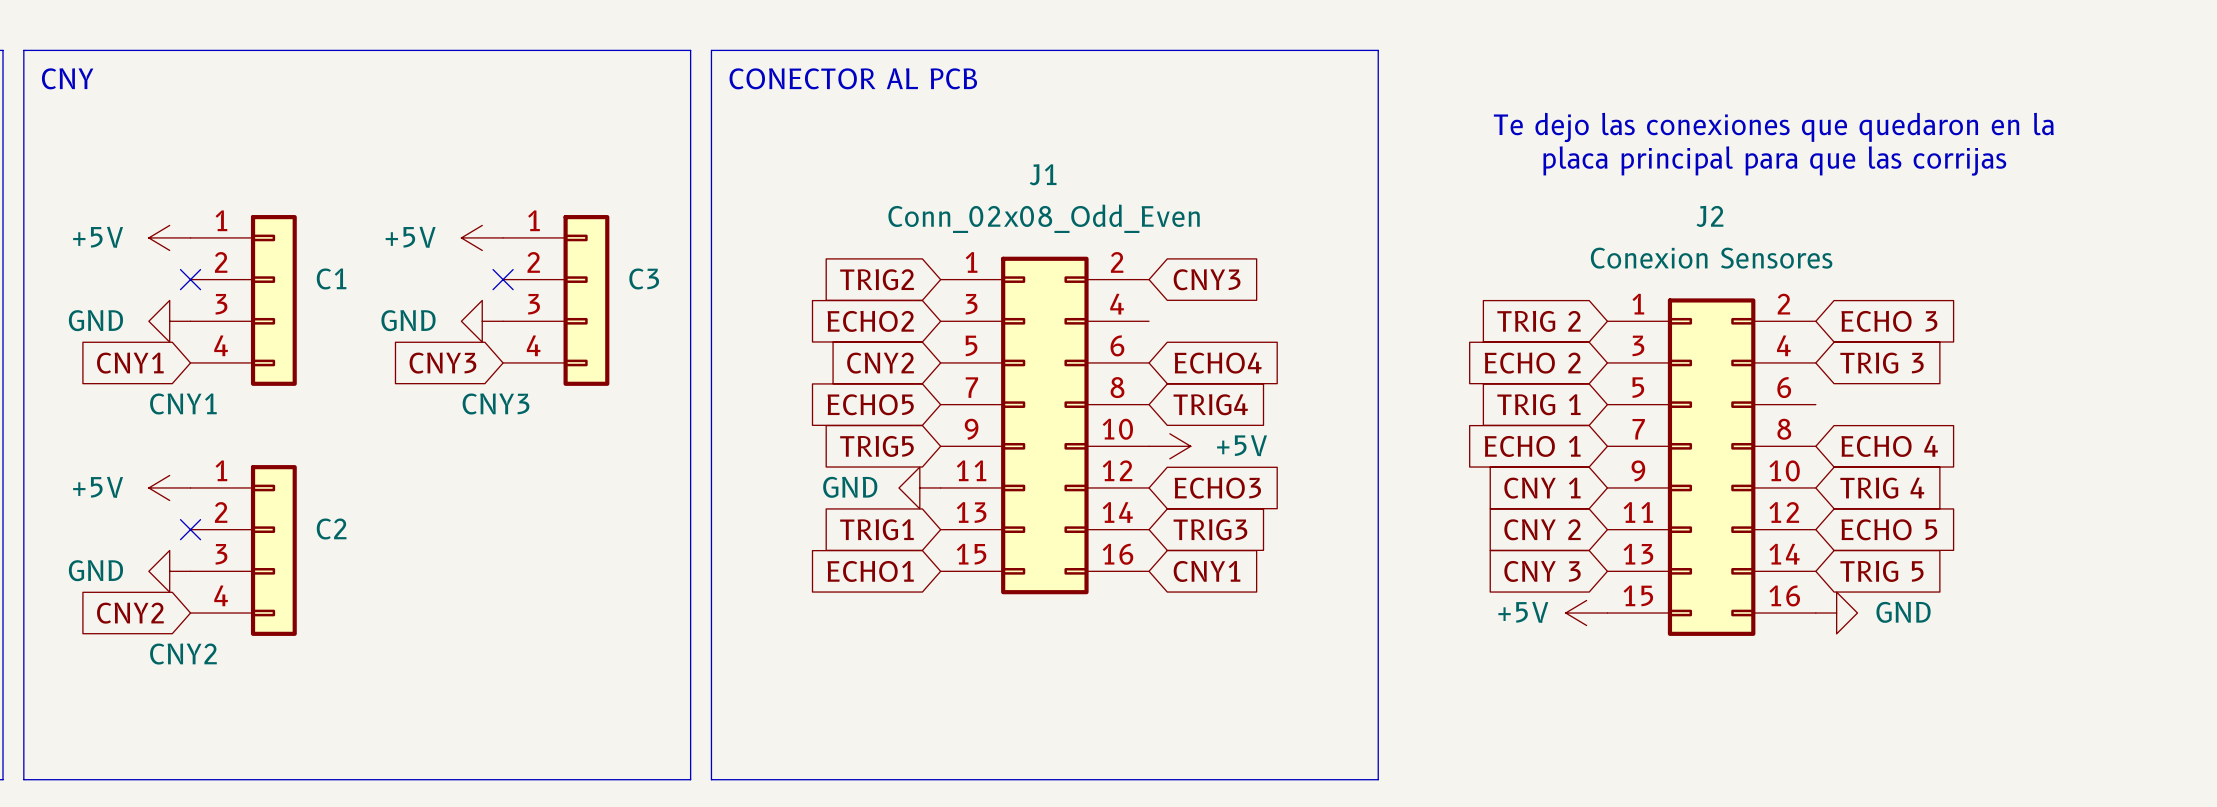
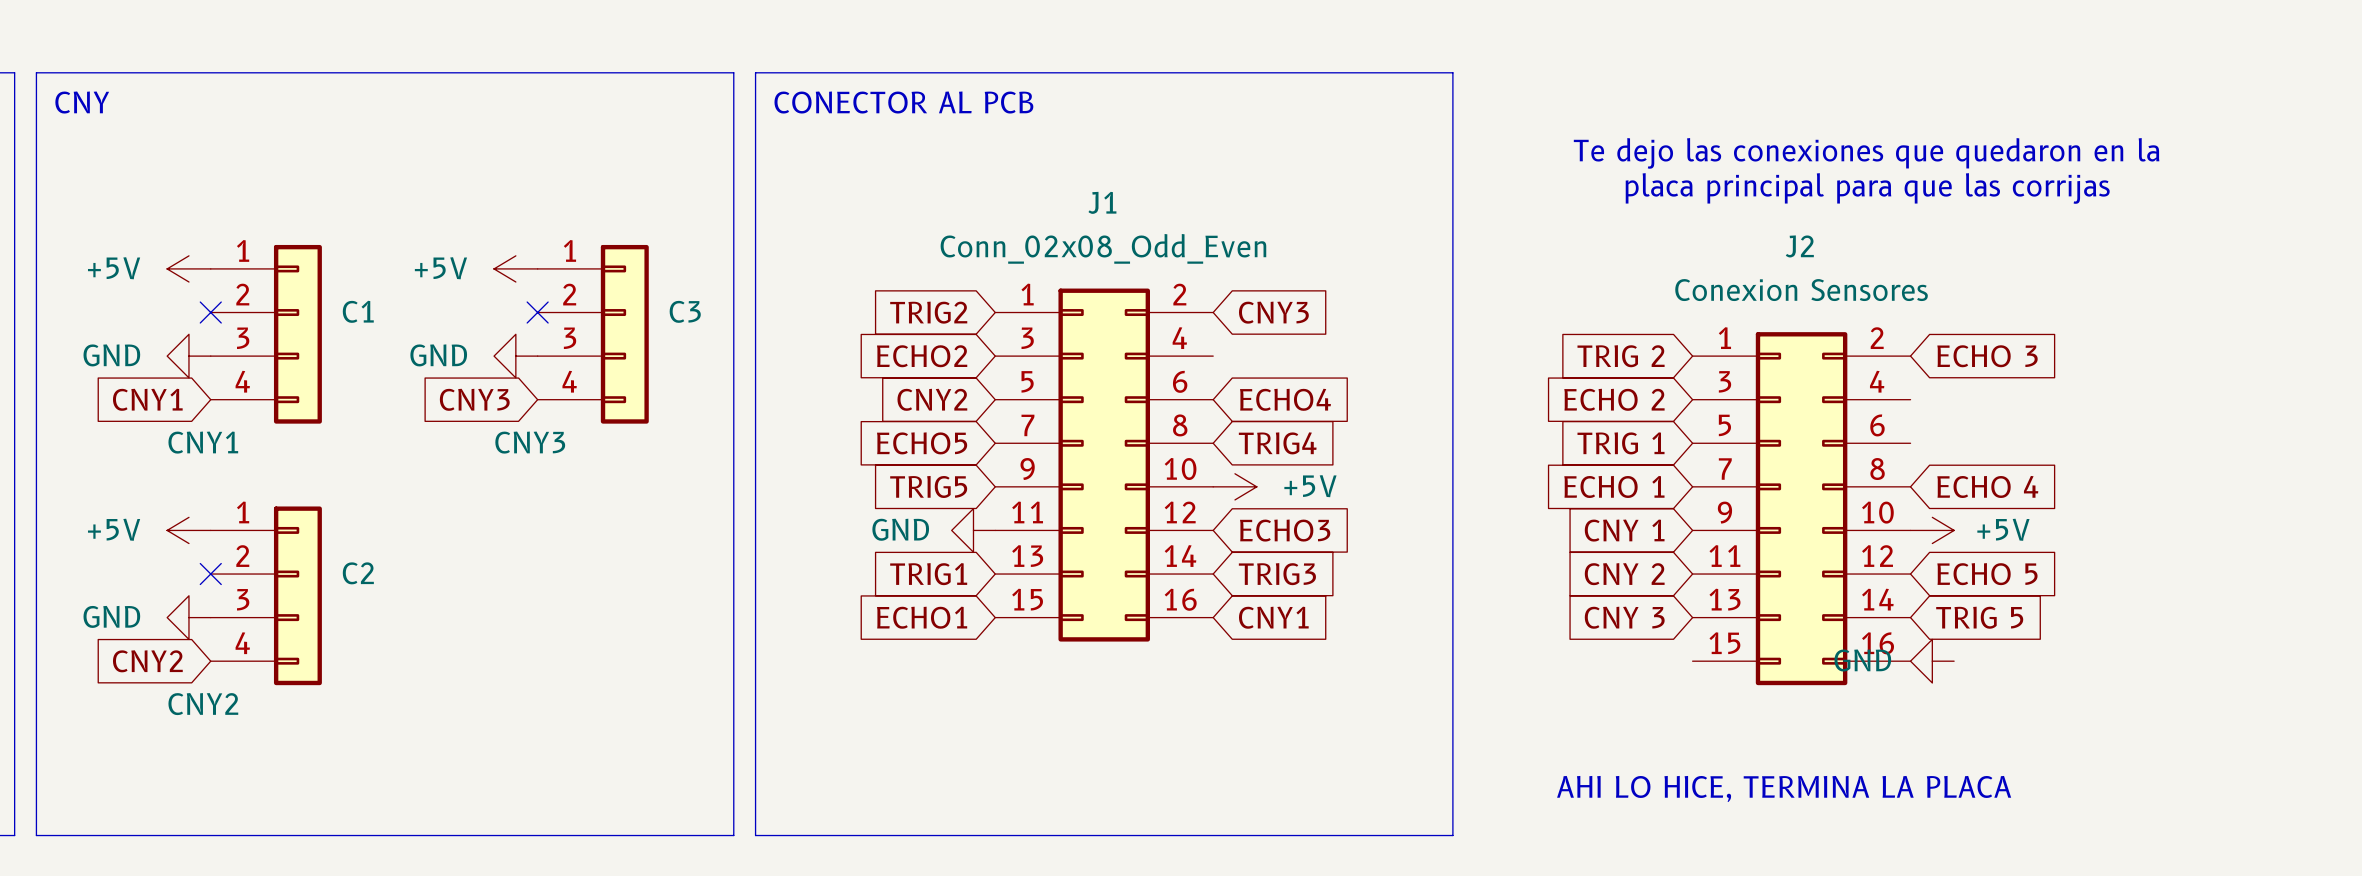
global label: TRIG 3 (1882, 363) -> none
global label: TRIG 4 (1882, 488) -> none
power symbol rotation: 0° (1586, 613) -> 180° (1932, 530)
power symbol position: +5V (1586, 613) -> +5V (1932, 530)
power symbol rotation: 0° (1836, 613) -> 180° (1932, 661)
text: none -> AHI LO HICE, TERMINA LA PLACA (1784, 788)

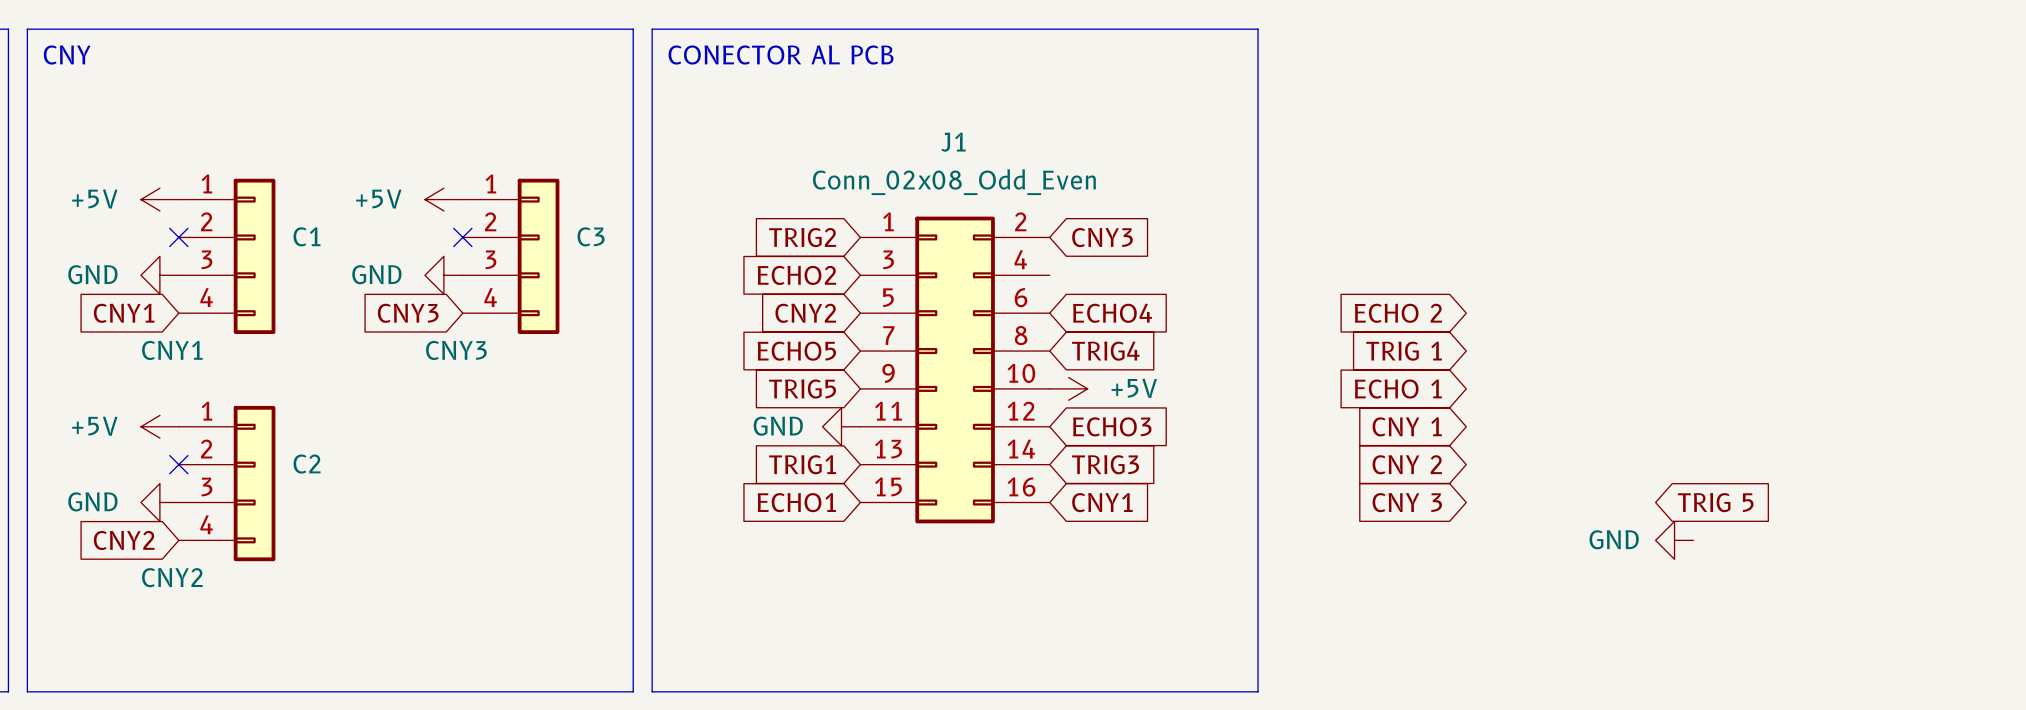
text: Te dejo las conexiones que quedaron en la (1866, 153) -> none
text: placa principal para que las corrijas (1867, 188) -> none
global label: TRIG 2 (1621, 356) -> none
global label: ECHO 3 (1987, 356) -> none
global label: ECHO 4 (1987, 486) -> none
J2: Conexion Sensores (1801, 508) -> none
power symbol: +5V (1932, 530) -> none
global label: ECHO 5 (1987, 574) -> none
text: AHI LO HICE, TERMINA LA PLACA (1784, 788) -> none

